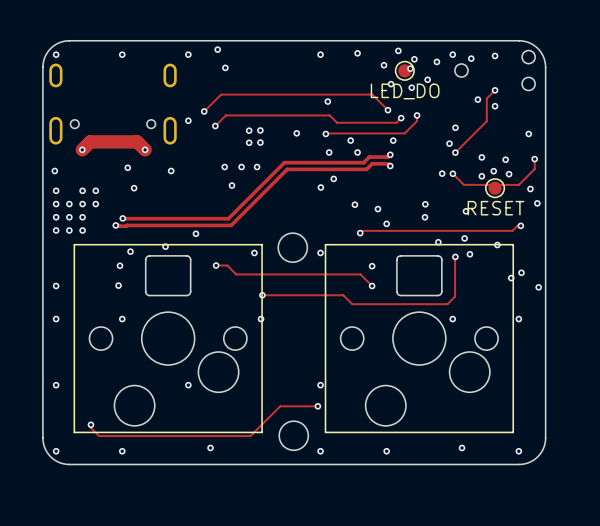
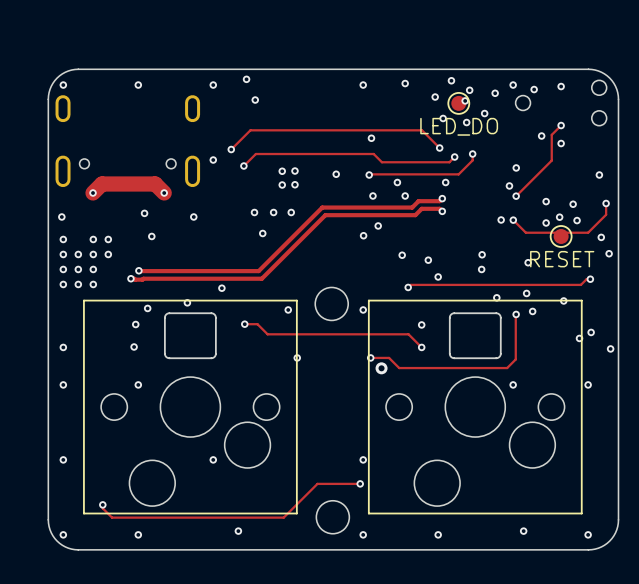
track: (262, 295) (327, 295) -> none
via: none -> (381, 368)
via position: (261, 319) -> (370, 357)

